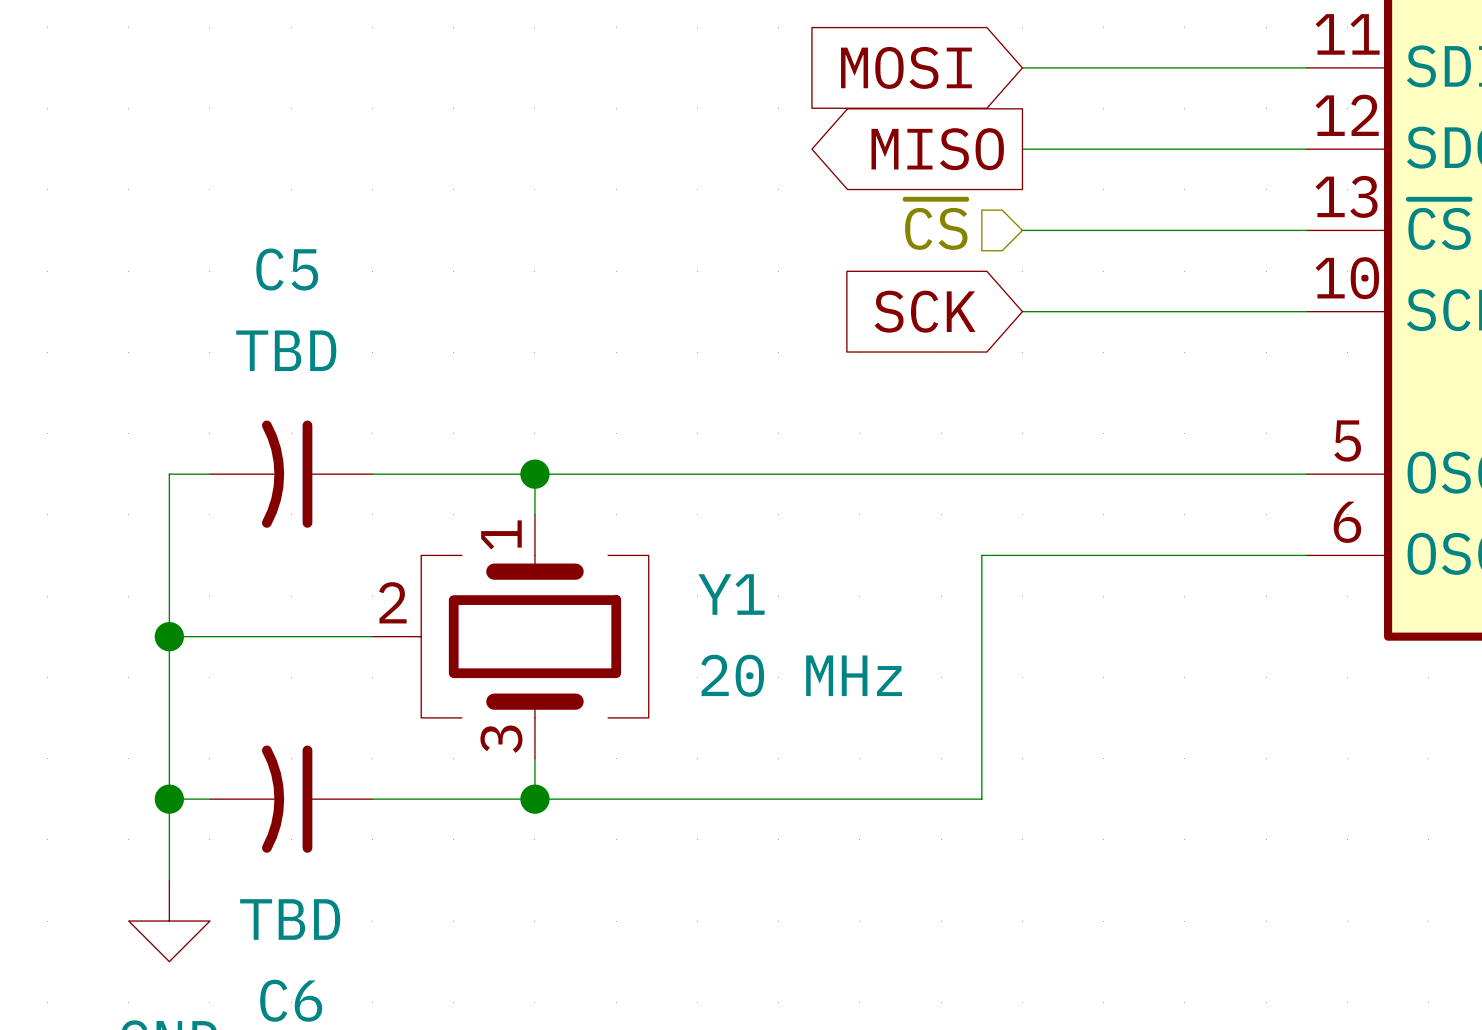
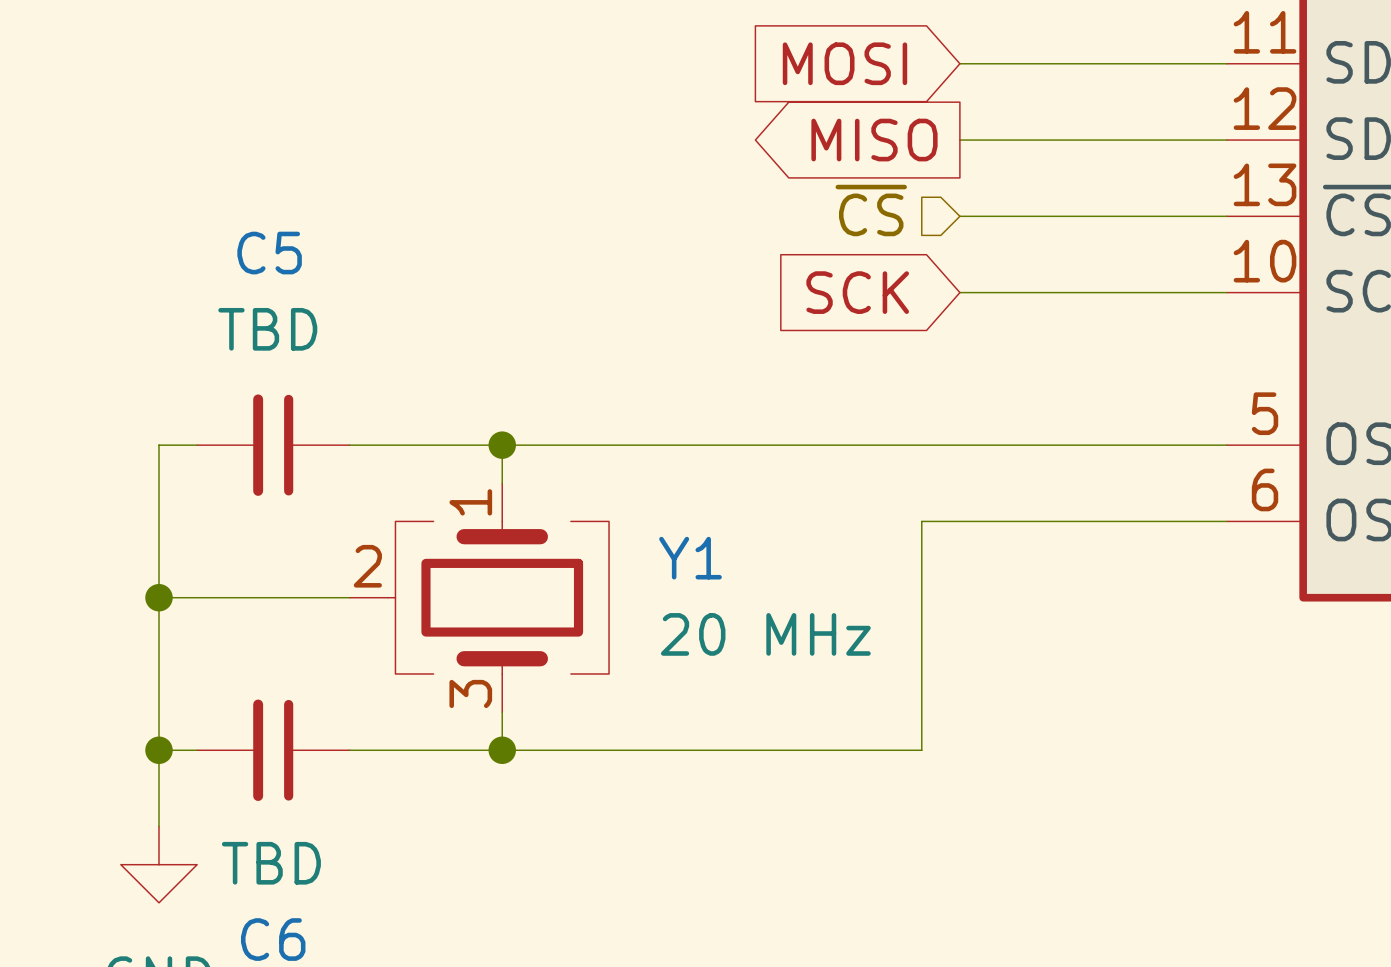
C5 symbol: [209, 420, 373, 528] -> [197, 394, 350, 496]
C6 symbol: [209, 745, 373, 853] -> [197, 699, 350, 801]

